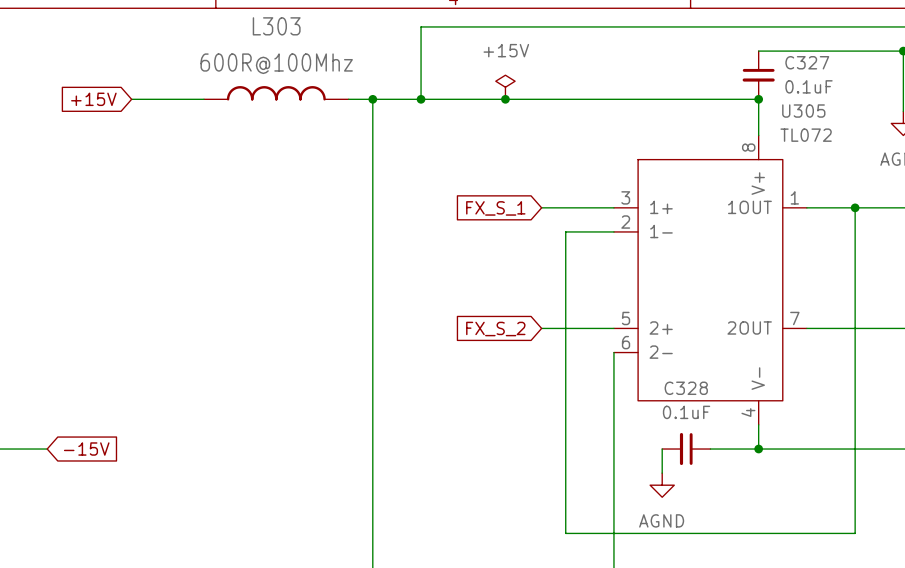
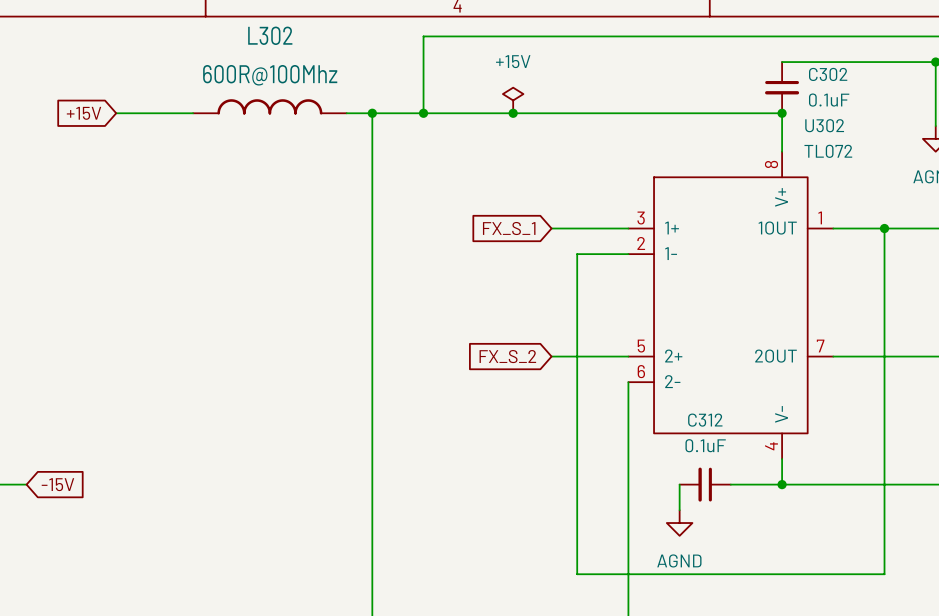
L303 name: L303 (276, 26) -> L302 (270, 35)
C327 name: C327 (807, 62) -> C302 (828, 74)
U305 name: U305 (803, 111) -> U302 (824, 125)
C328 name: C328 (686, 388) -> C312 (705, 420)

